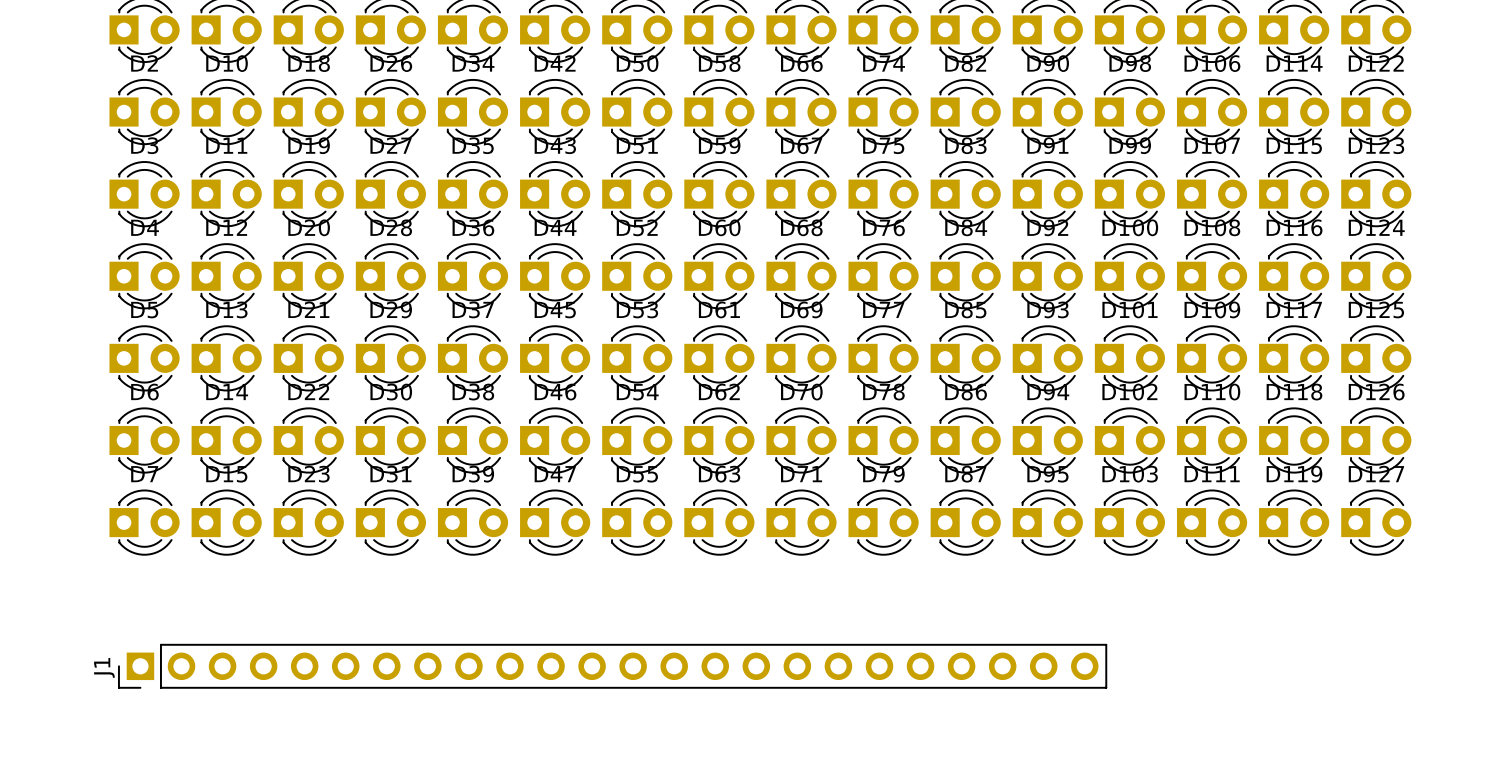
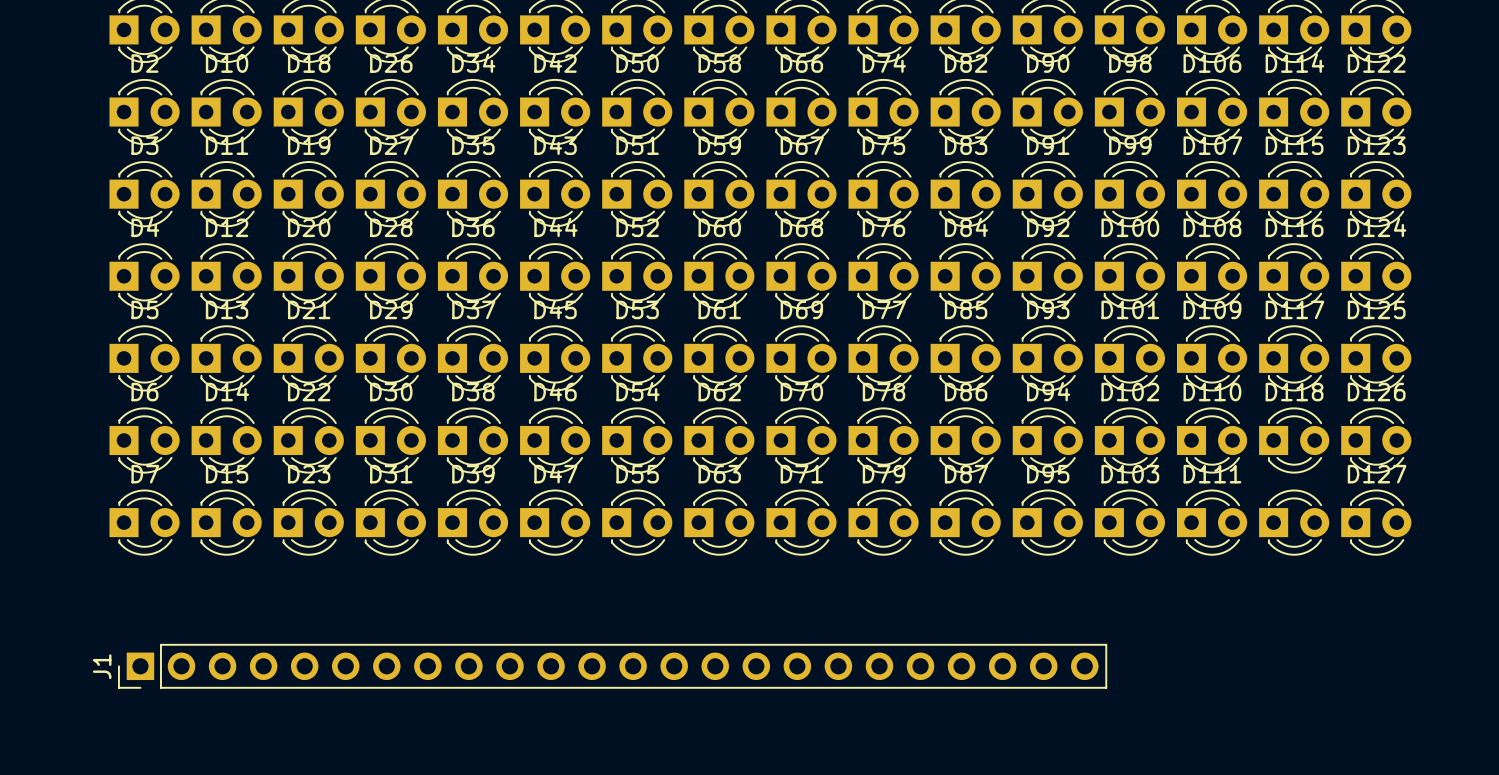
D119 name: D119 (1294, 474) -> none

